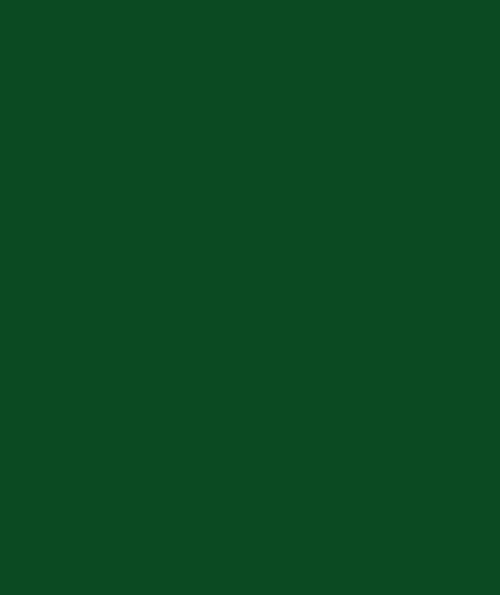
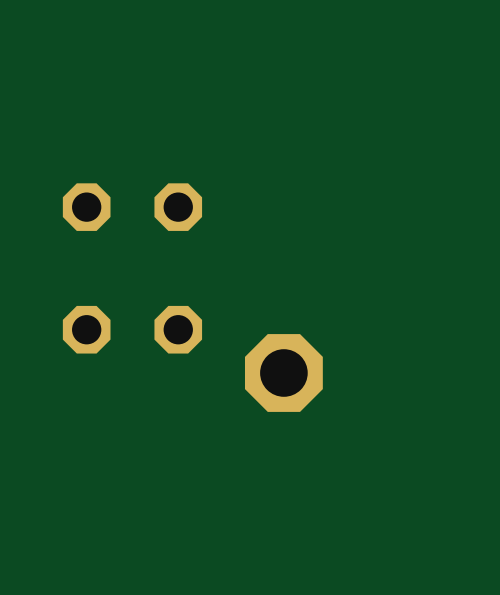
part: none -> (132, 207)
part: none -> (132, 329)
part: none -> (283, 372)

